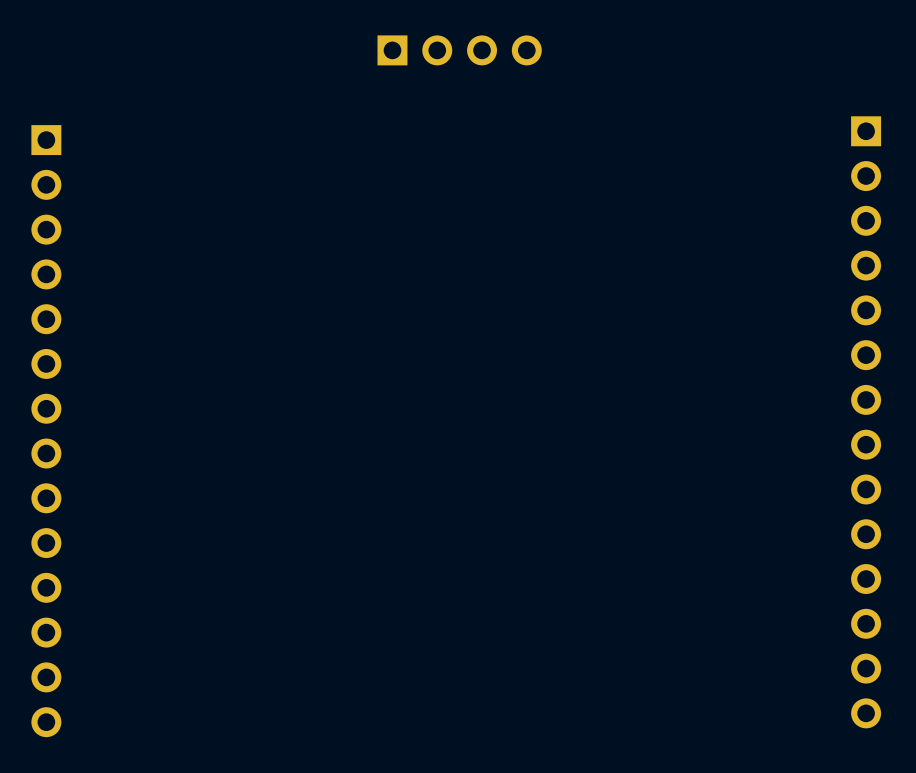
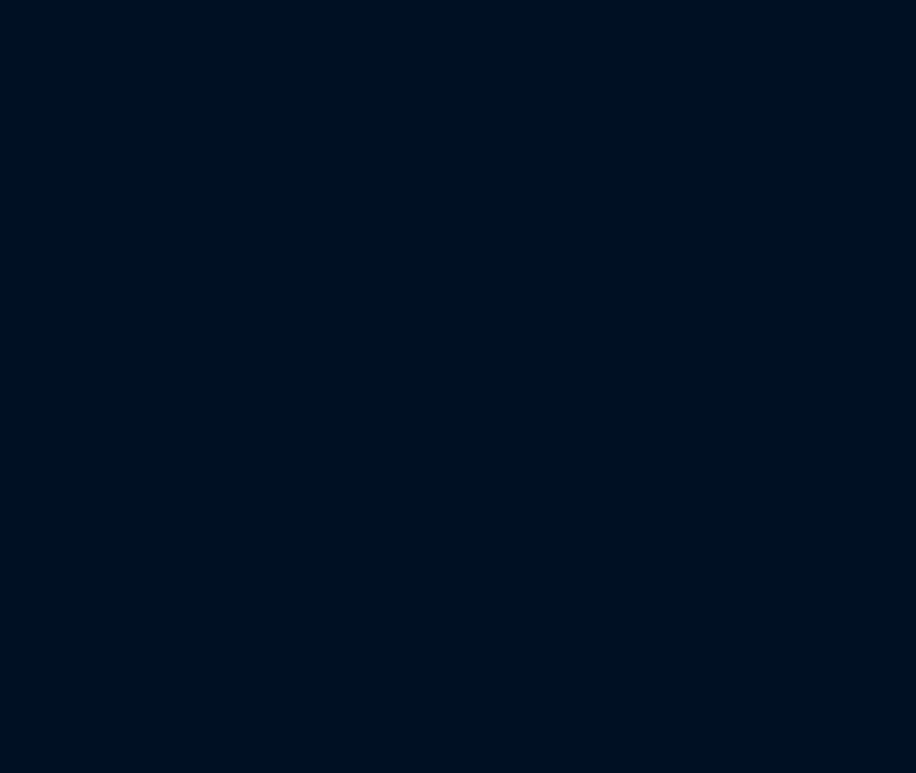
part: (459, 50) -> none
part: (866, 422) -> none
part: (46, 431) -> none

